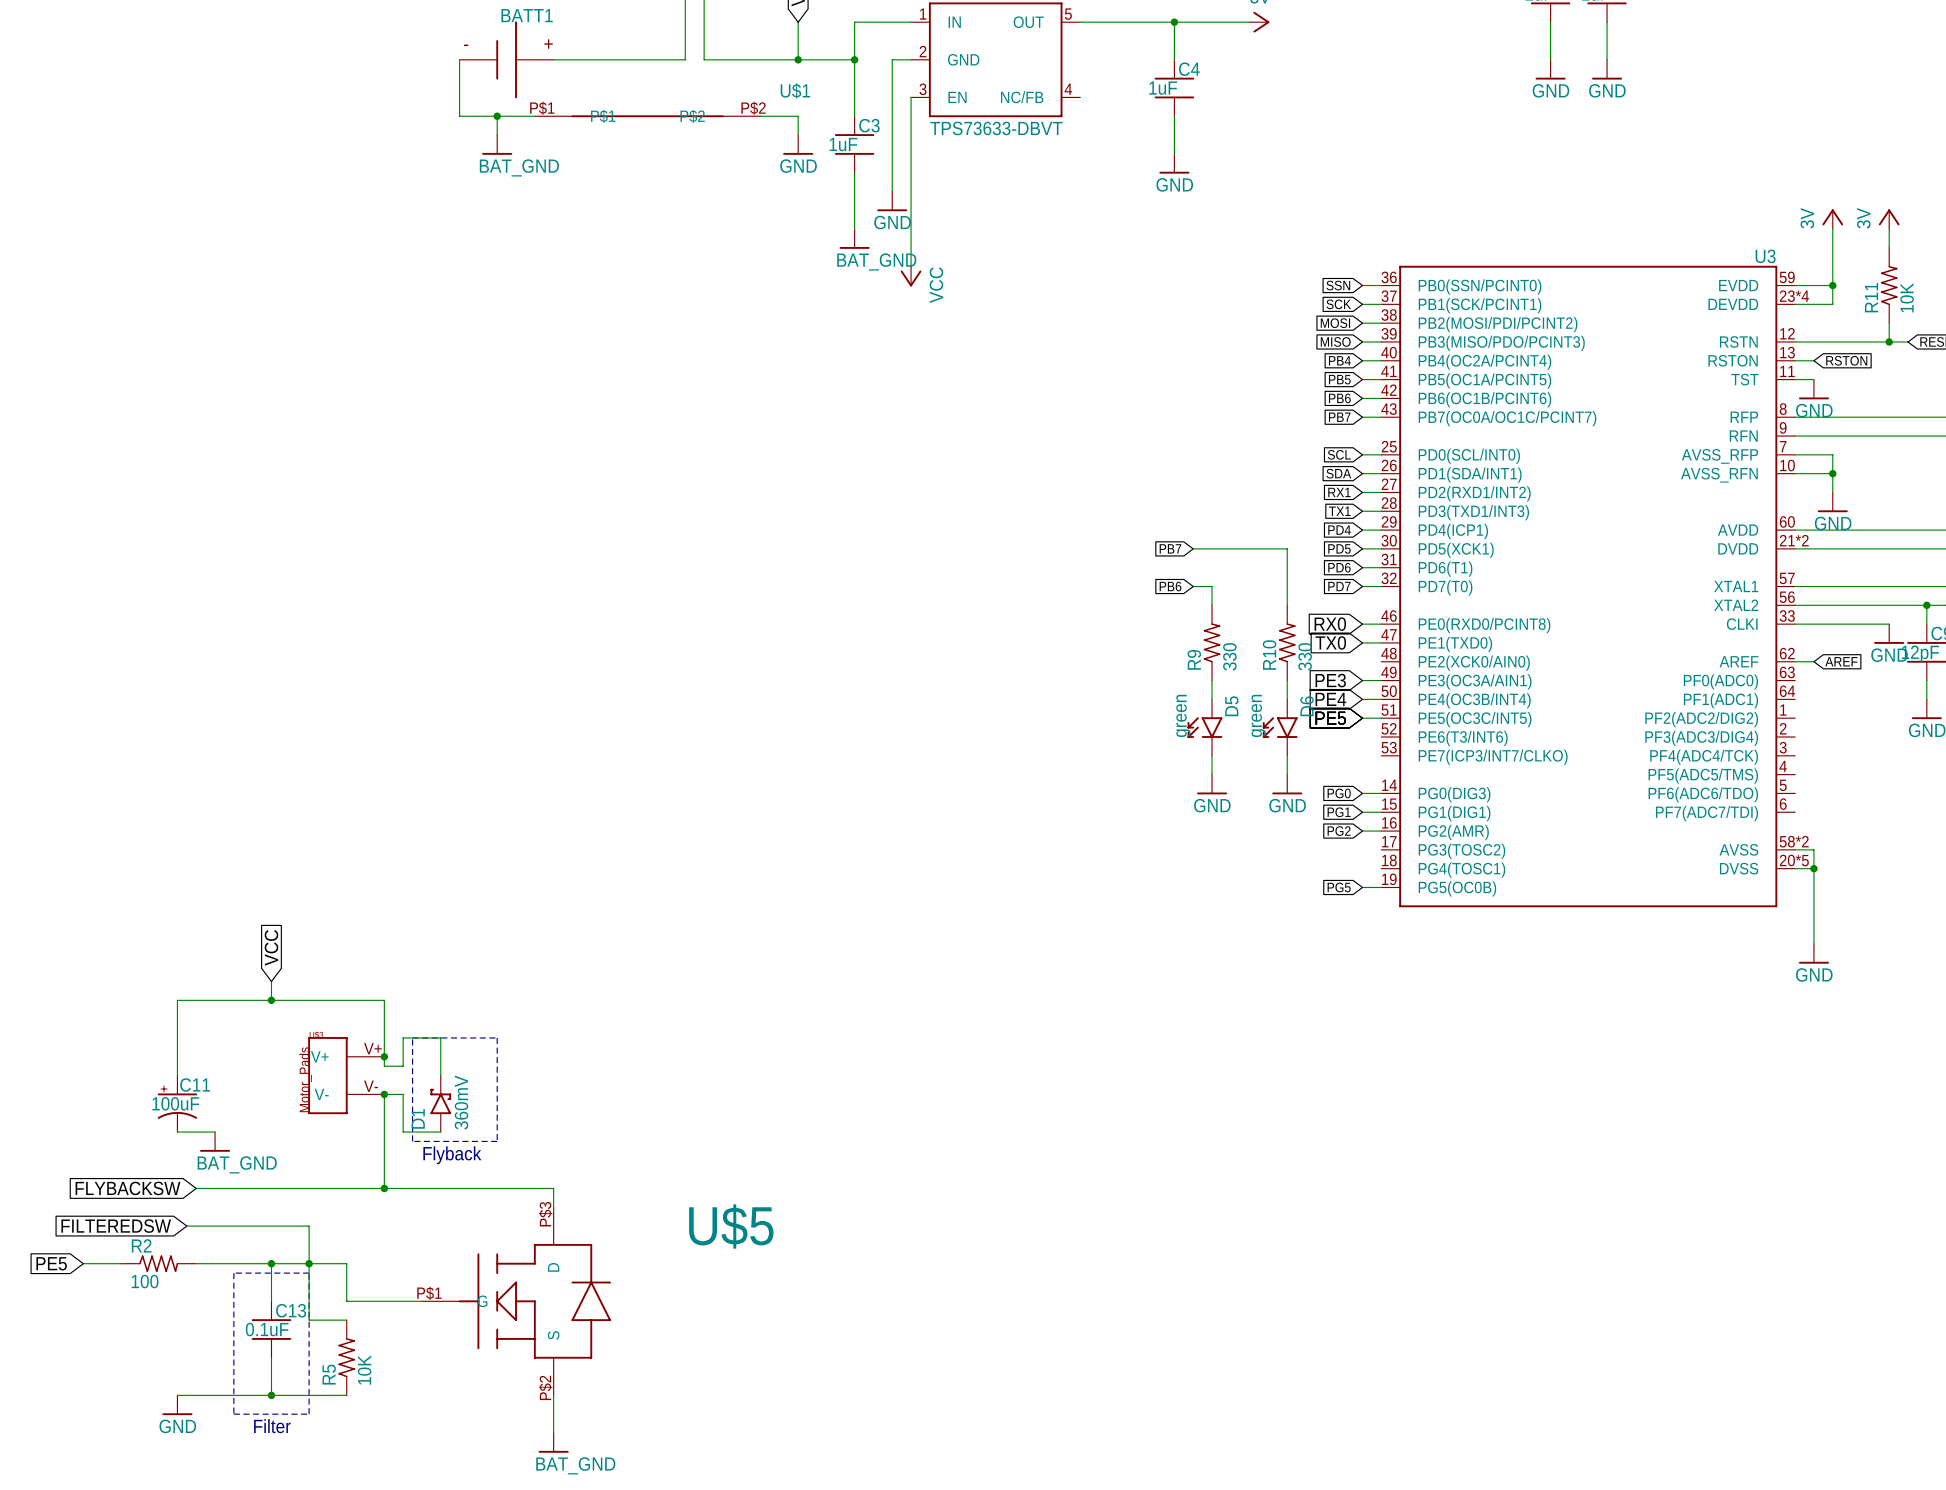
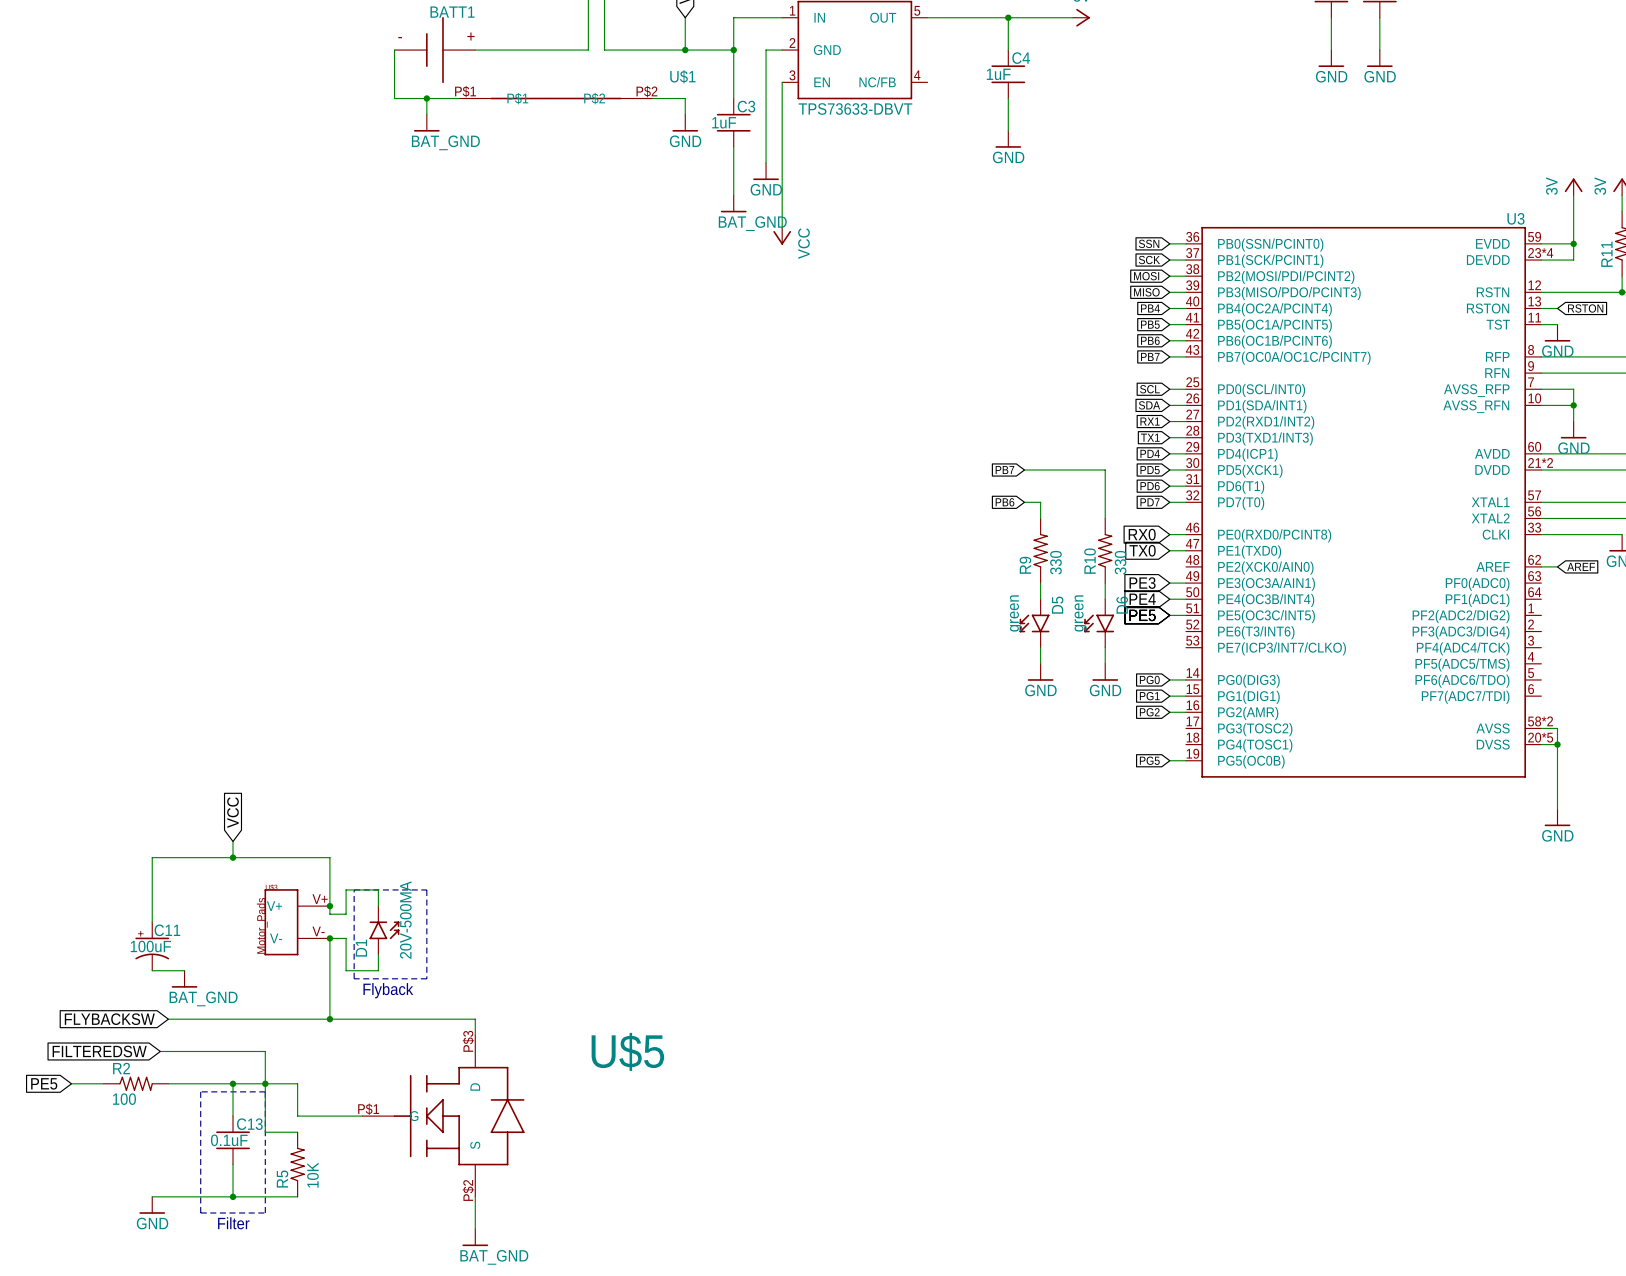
D1 symbol: [430, 1075, 452, 1133] -> [369, 906, 400, 955]
D1 value: 360mV (461, 1102) -> 20V-500MA (405, 920)

